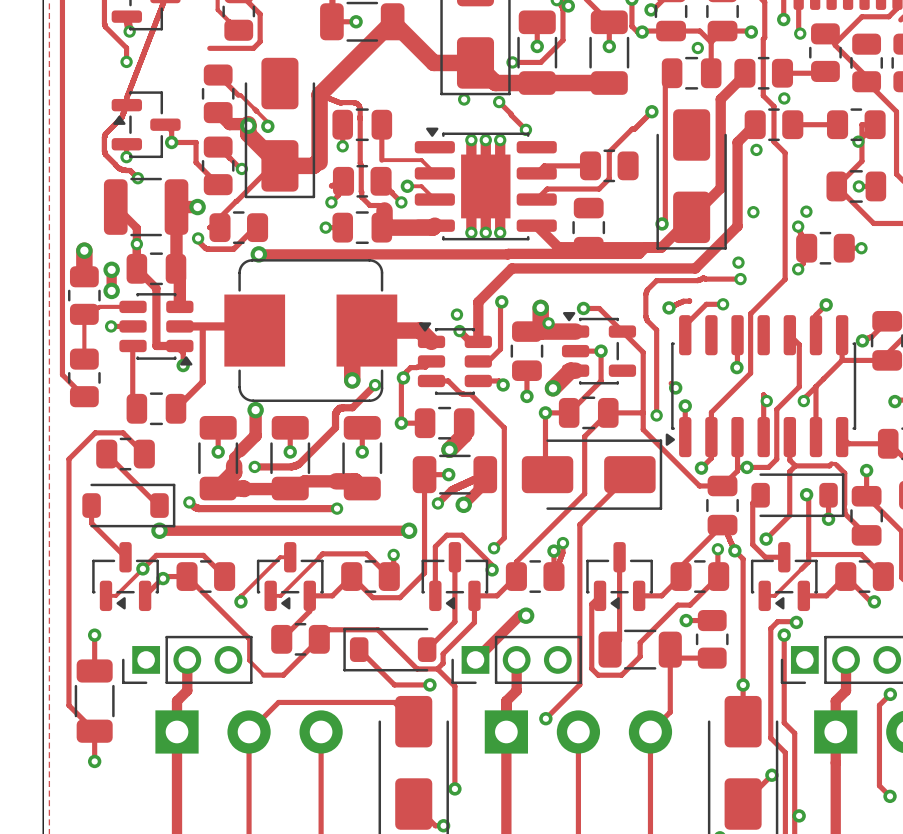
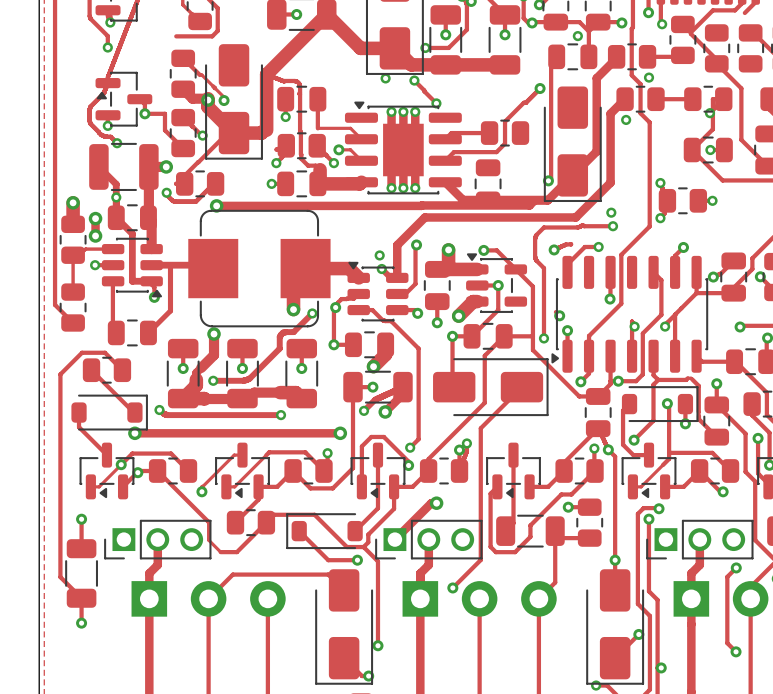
via: (806, 211) -> none
via: (753, 212) -> none
via: (548, 323) -> none

